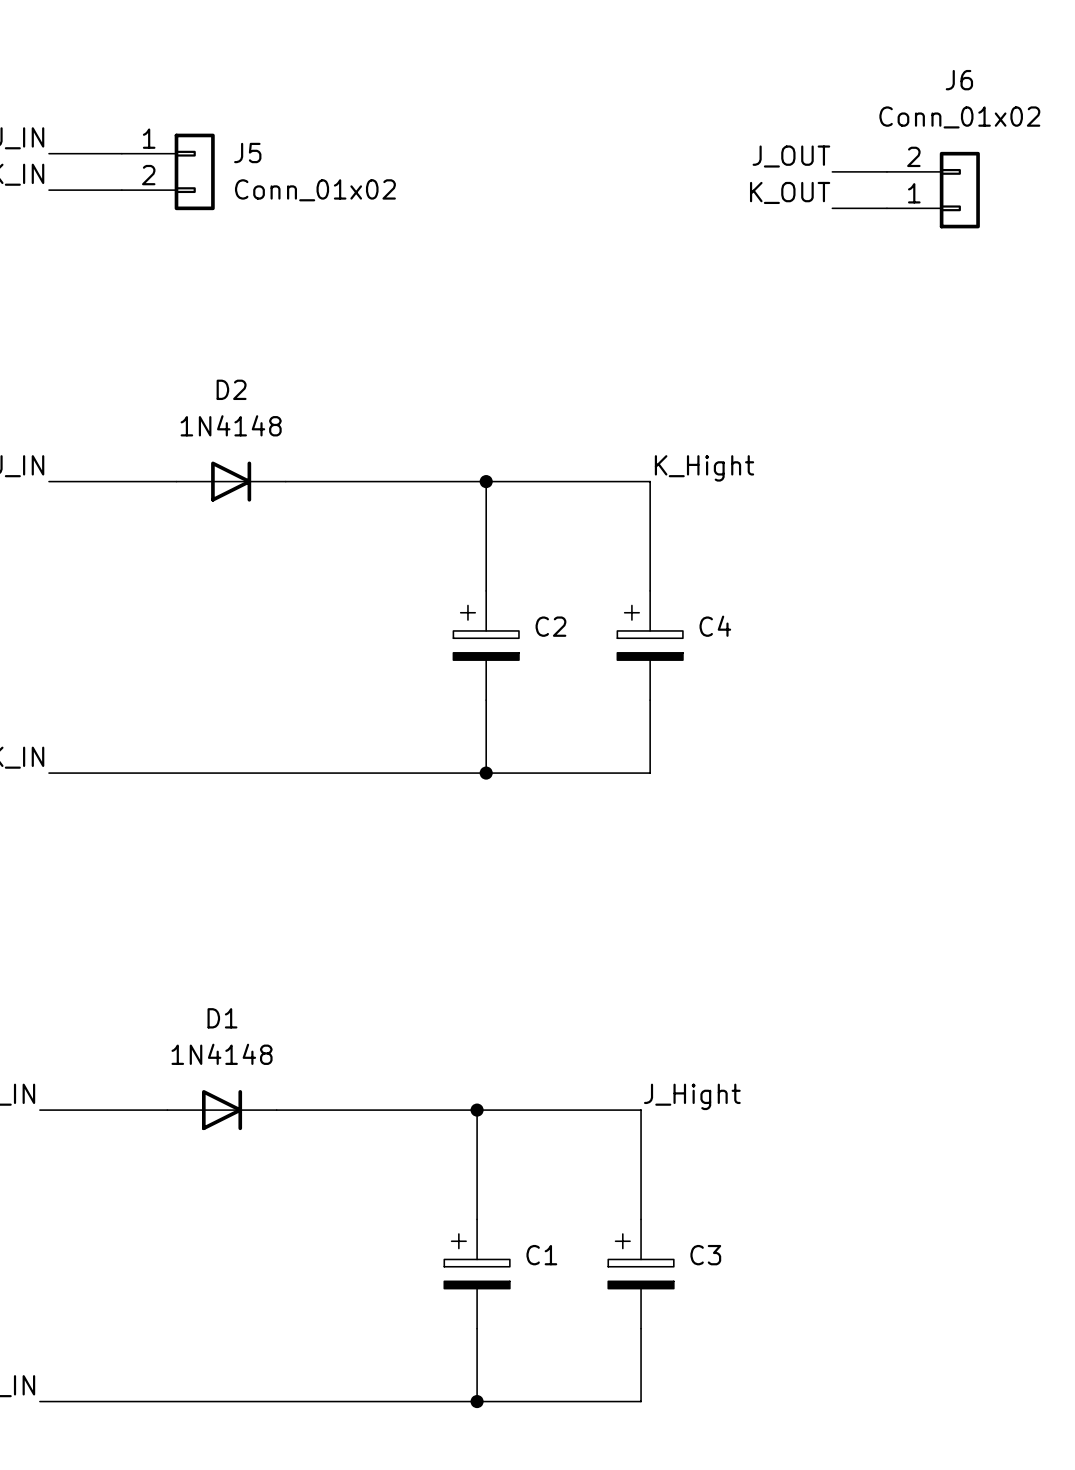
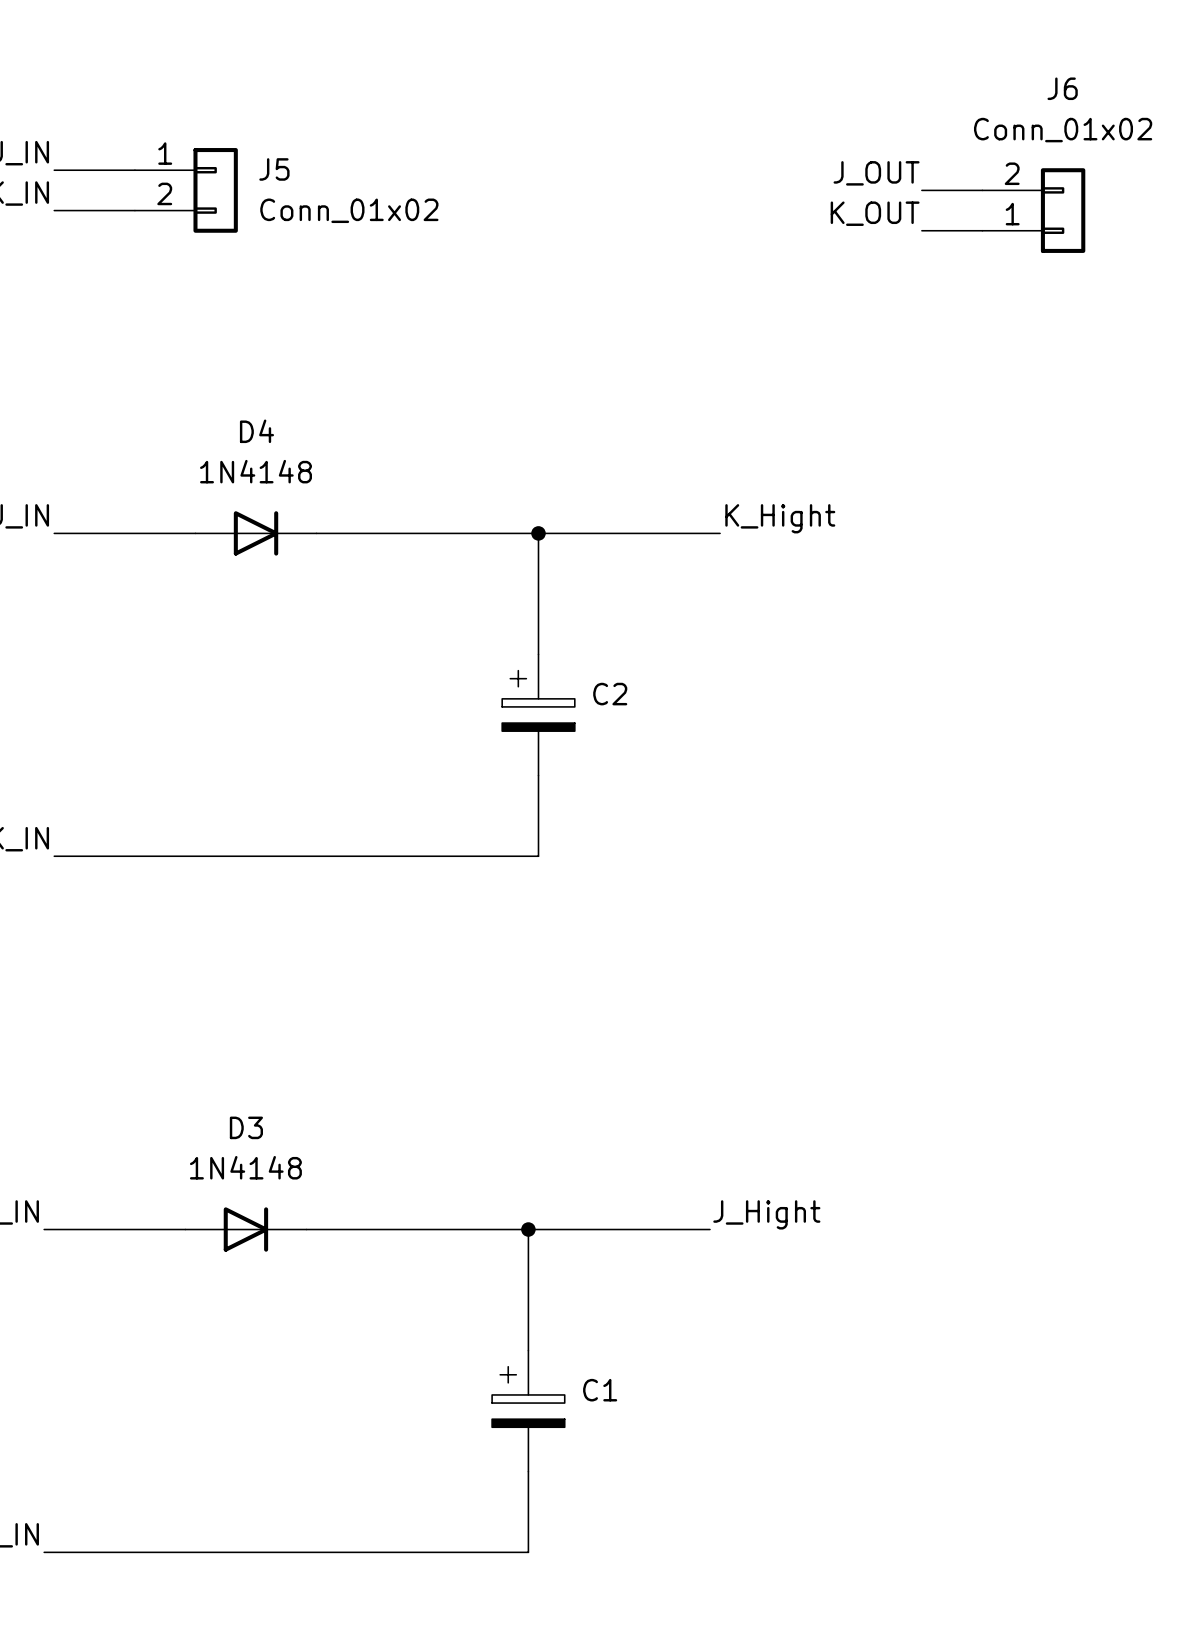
D2 name: D2 (231, 389) -> D4 (256, 431)
wire: (650, 481) (650, 590) -> none
C4: (650, 645) -> none
wire: (650, 700) (650, 773) (486, 773) -> none
junction: (486, 773) -> none
D1 name: D1 (222, 1018) -> D3 (246, 1127)
wire: (641, 1110) (641, 1219) -> none
C3: (641, 1274) -> none
wire: (641, 1328) (641, 1401) (477, 1401) -> none
junction: (477, 1401) -> none

